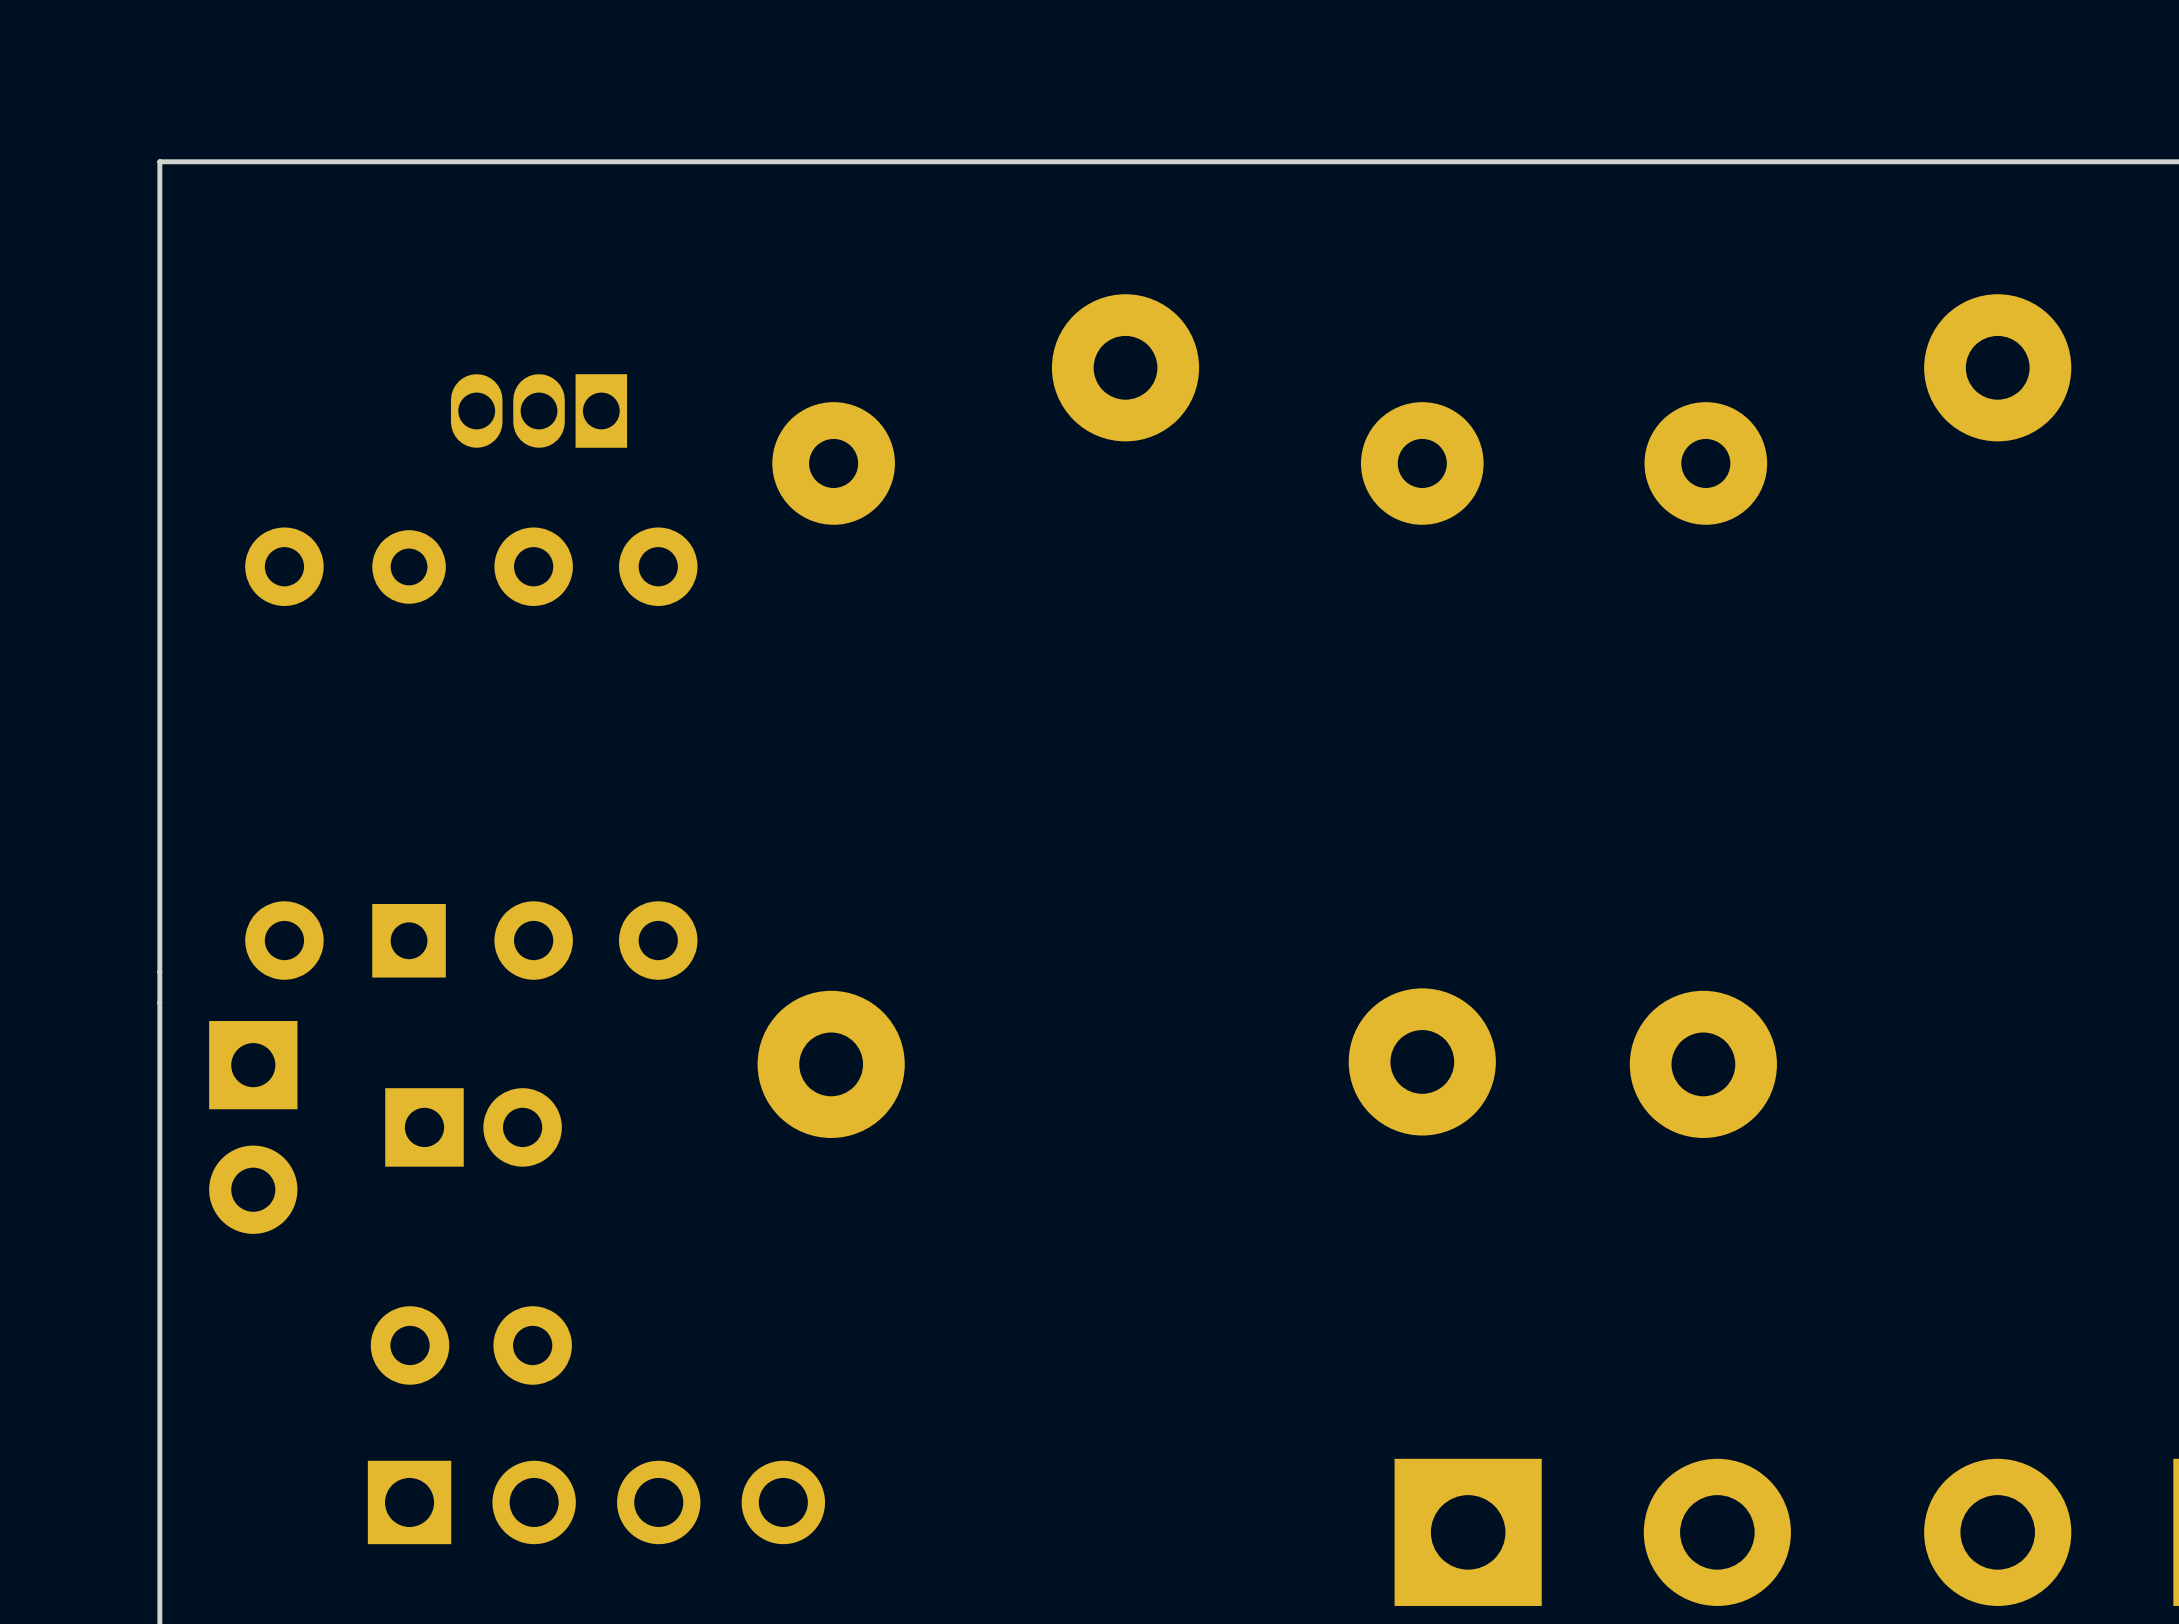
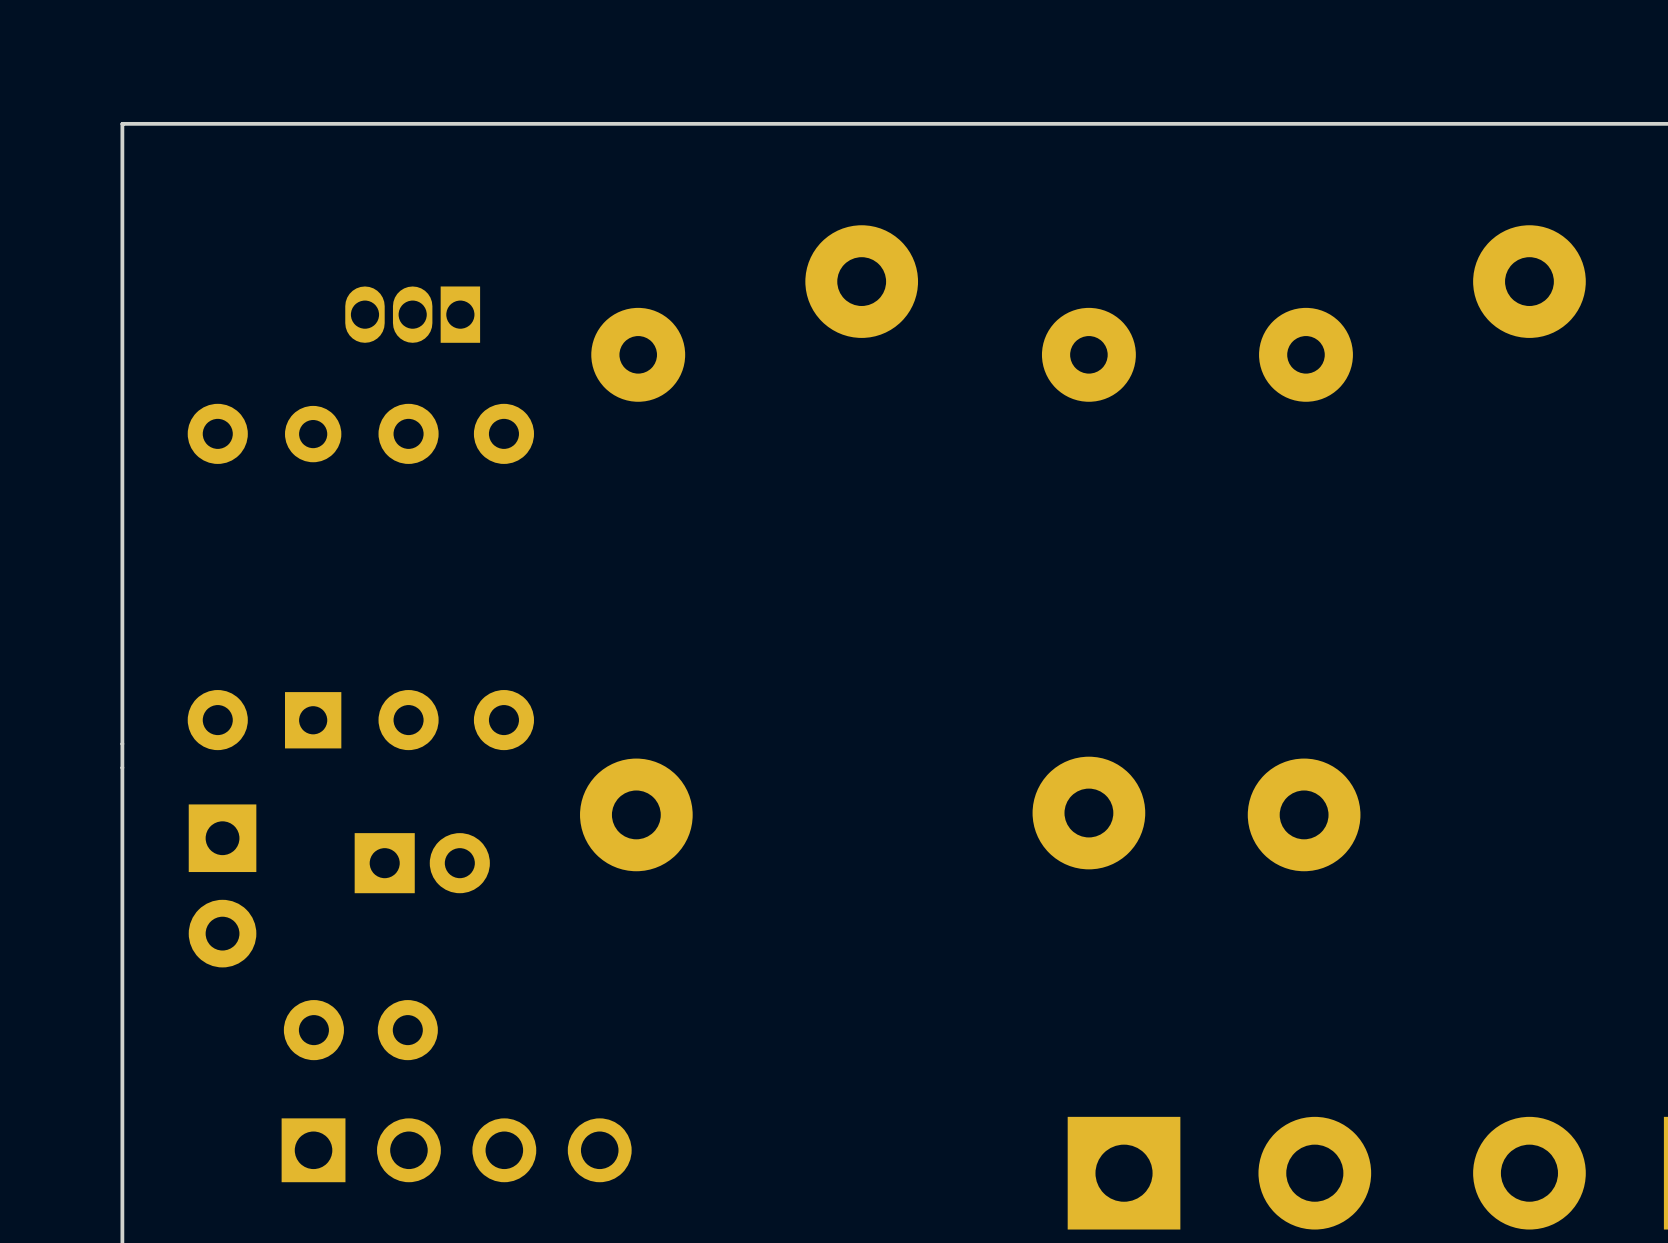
part position: (253, 1127) -> (222, 885)
part position: (473, 1127) -> (422, 863)

